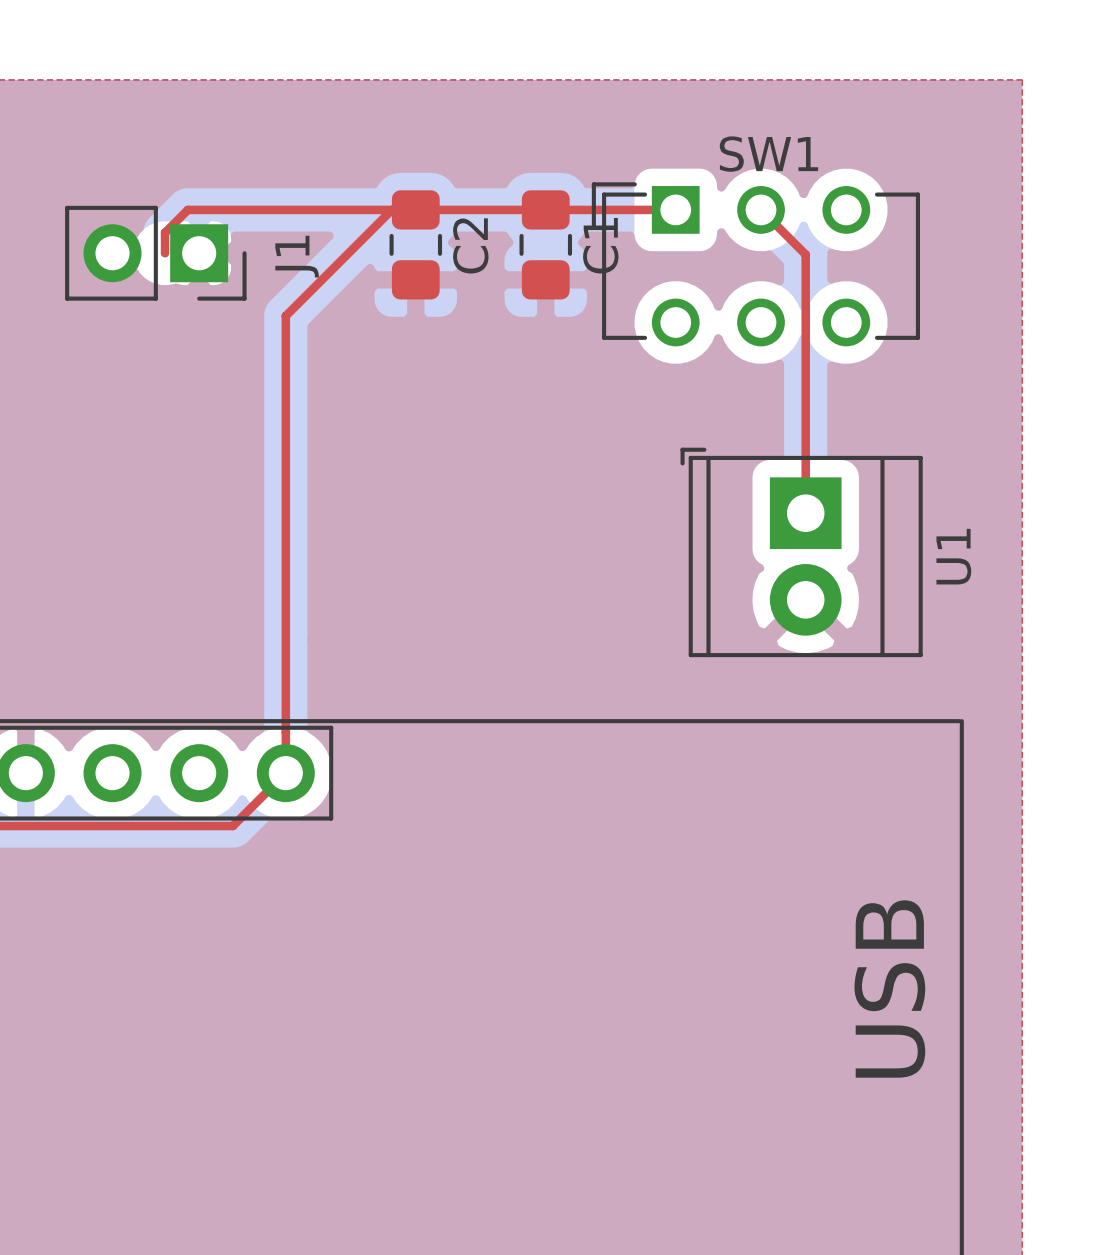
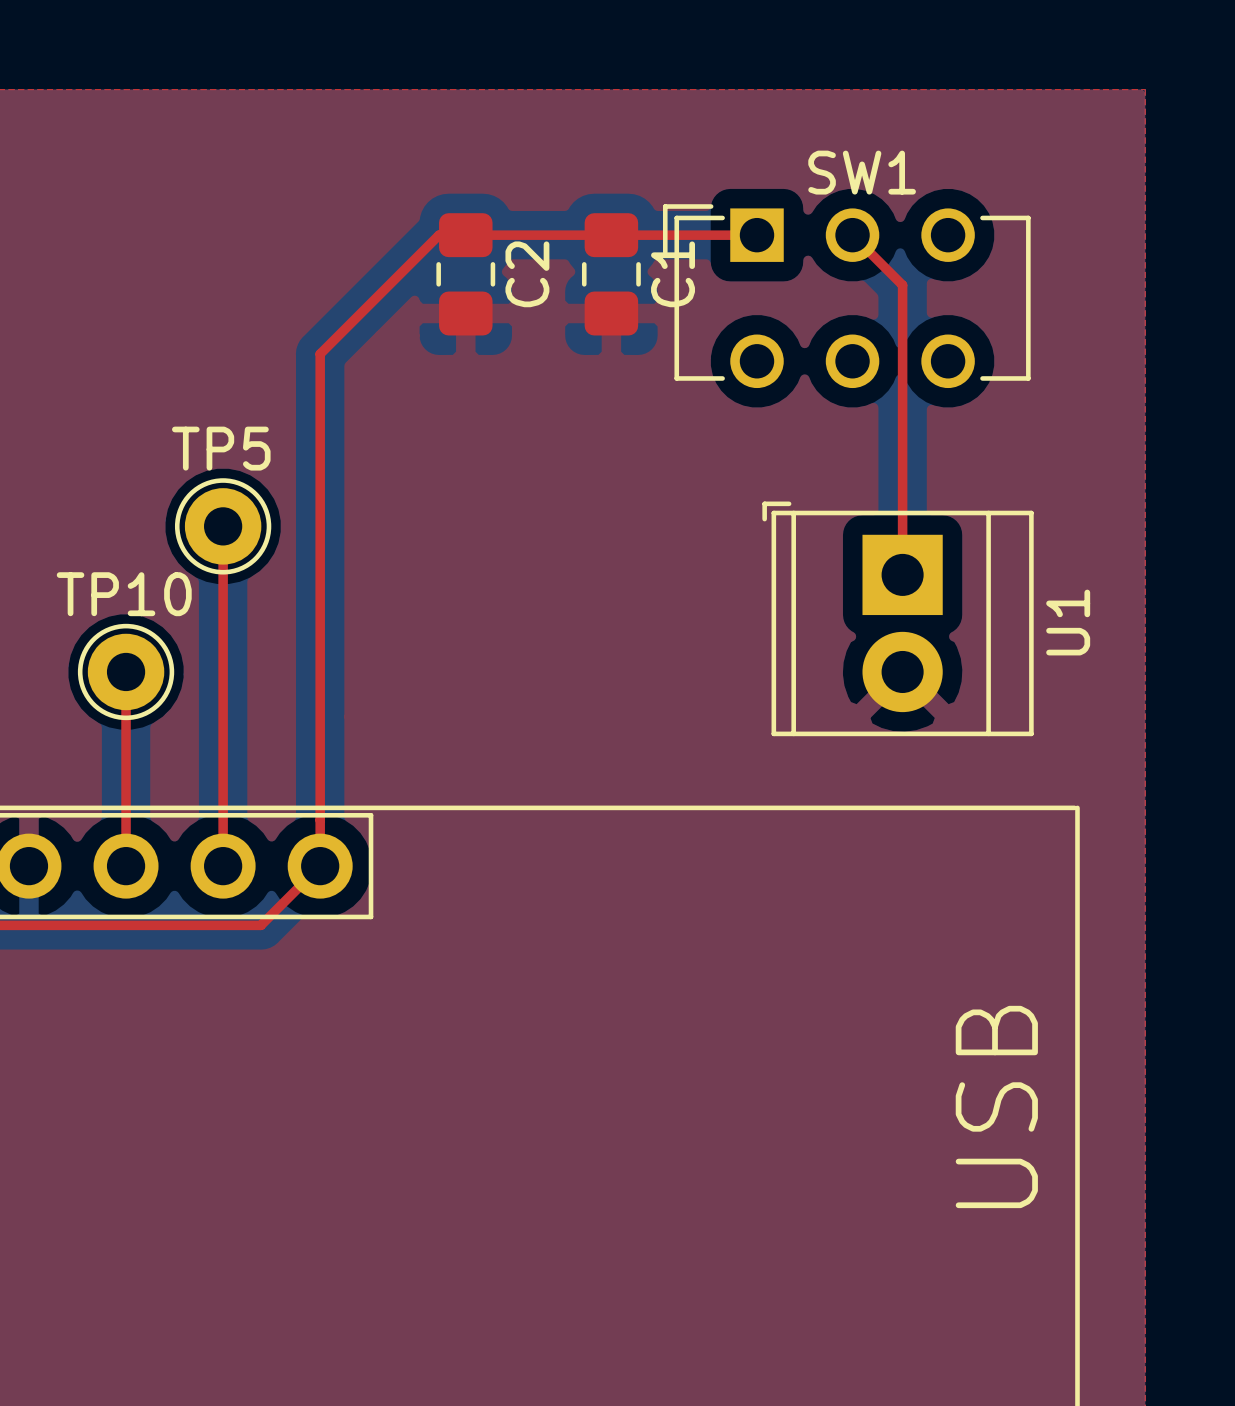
top track: (391, 209) (187, 209) (165, 232) (165, 253) -> none
J1: (155, 253) -> none
top track: none -> (223, 526) (223, 866)
TP5: none -> (223, 526)
top track: none -> (126, 671) (126, 866)
TP10: none -> (126, 671)

